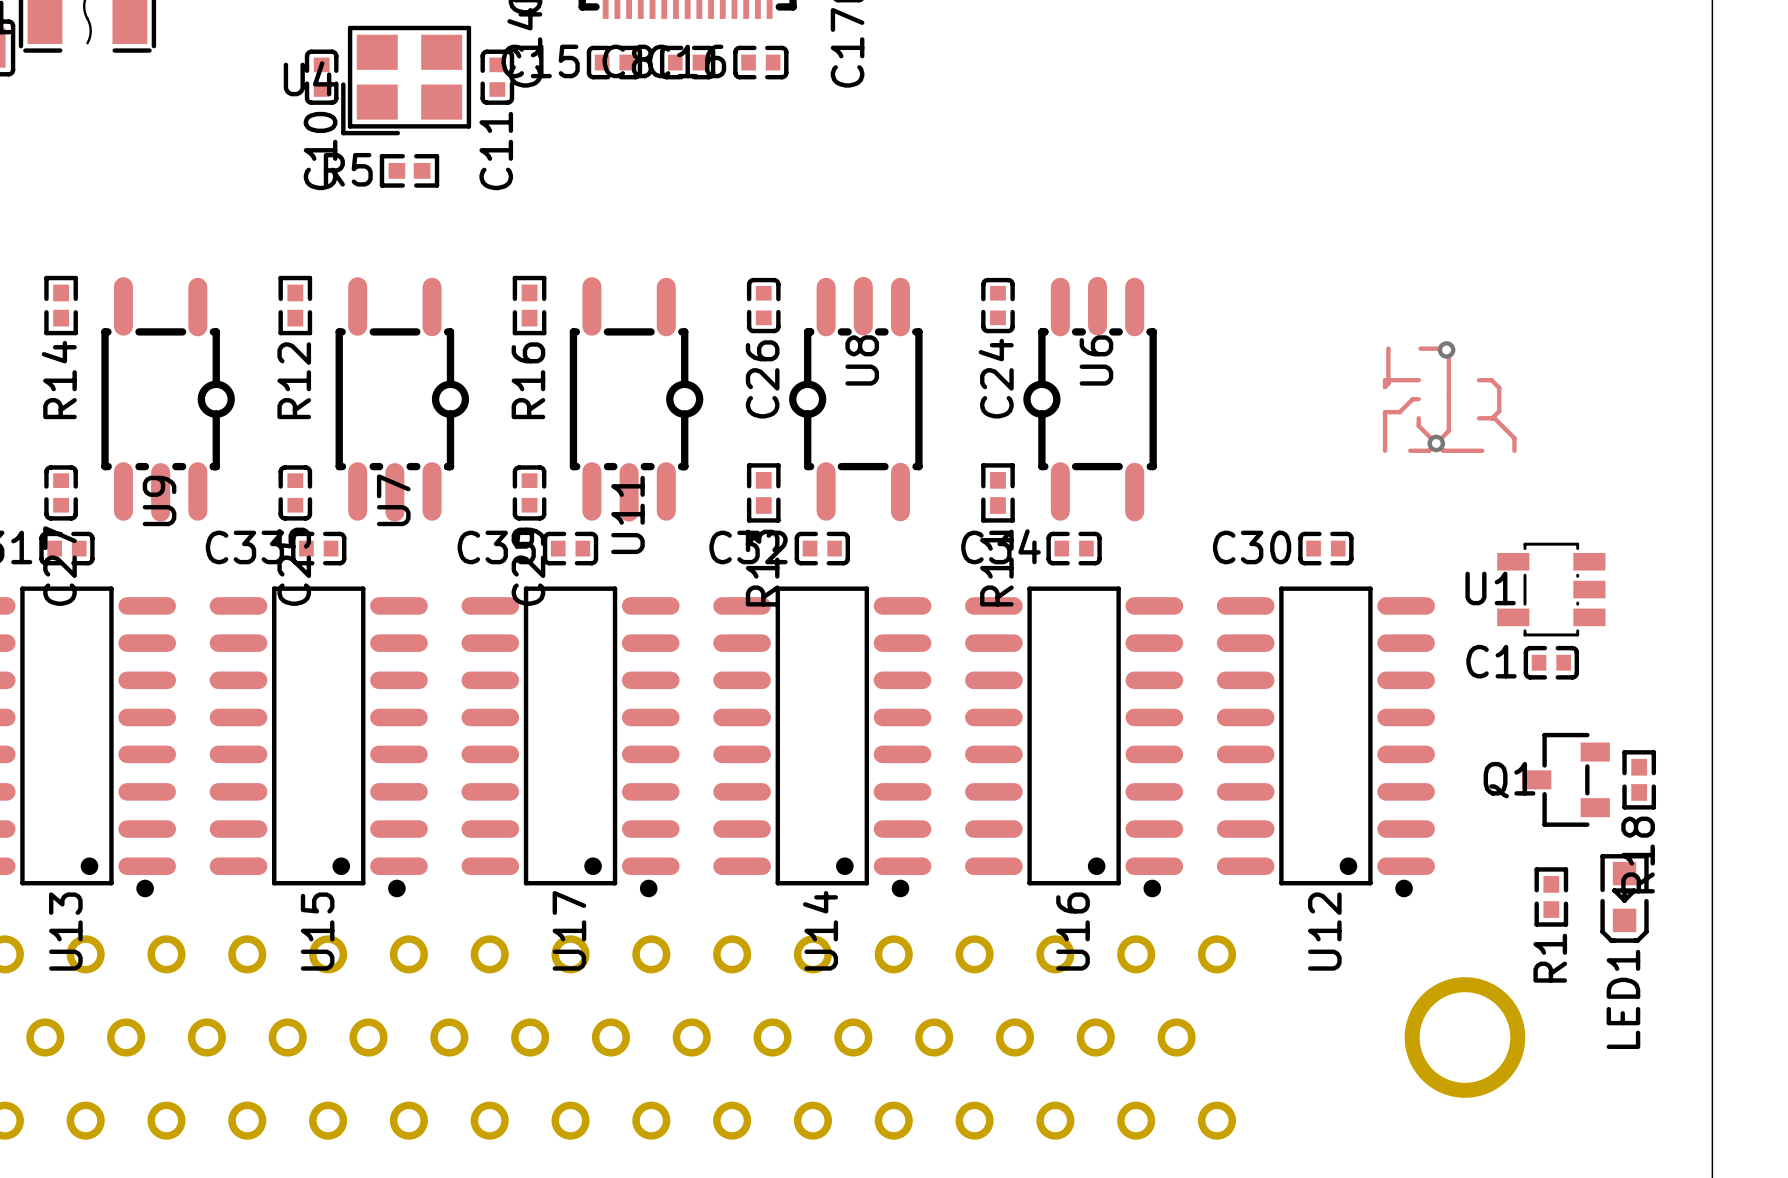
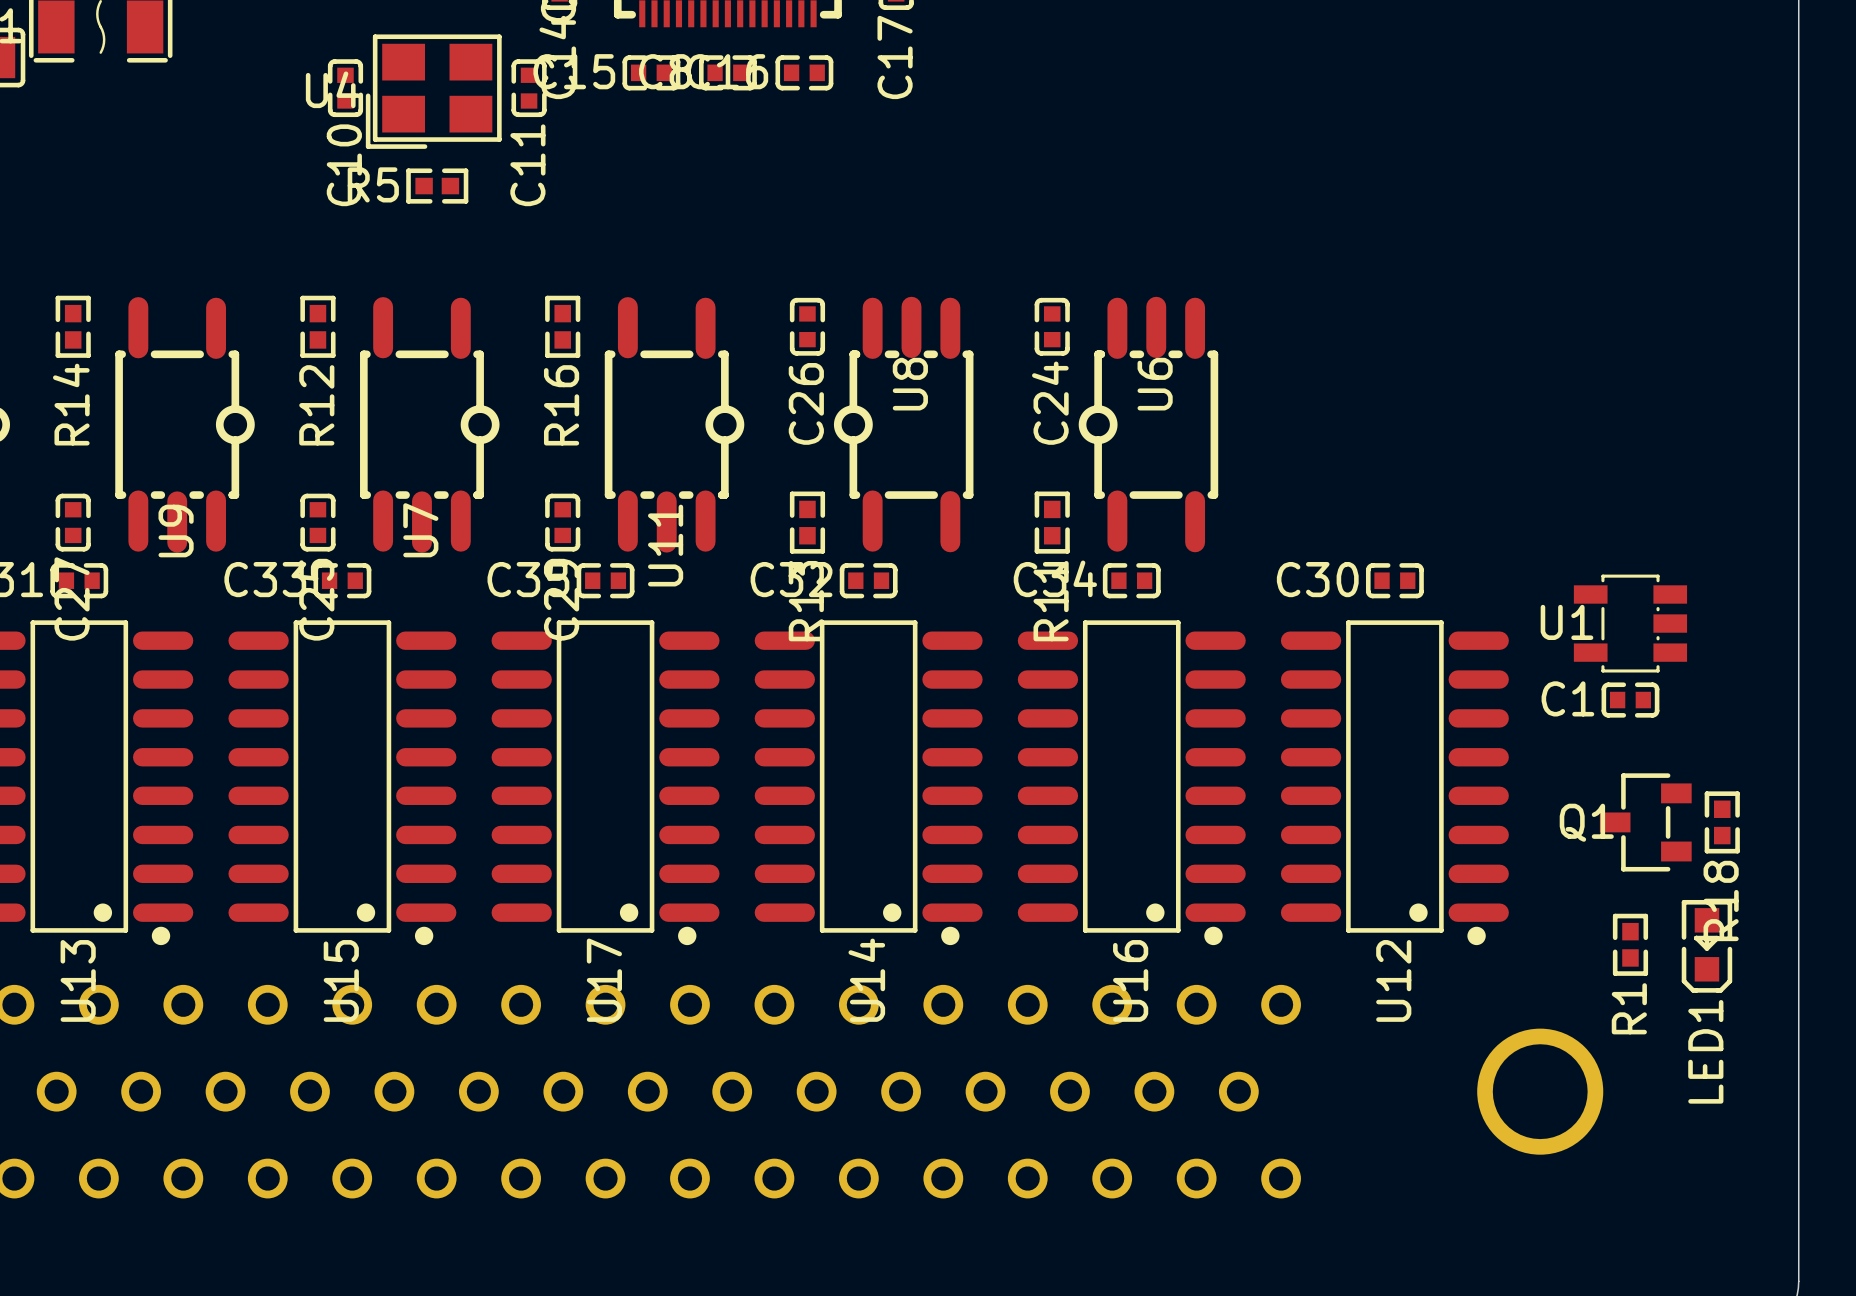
track: (1388, 348) (1388, 383) (1385, 386) (1385, 380) (1418, 380) -> none
track: (1420, 348) (1445, 348) (1448, 352) (1448, 430) (1428, 450) (1410, 450) -> none
via: (1446, 349) -> none
track: (1479, 380) (1491, 380) (1499, 387) (1499, 411) (1492, 418) -> none
track: (1418, 399) (1412, 399) (1399, 412) (1385, 412) (1385, 450) -> none
track: (1418, 418) (1418, 425) (1443, 450) (1482, 450) -> none
track: (1479, 418) (1494, 418) (1514, 438) (1514, 450) -> none
via: (1436, 443) -> none

